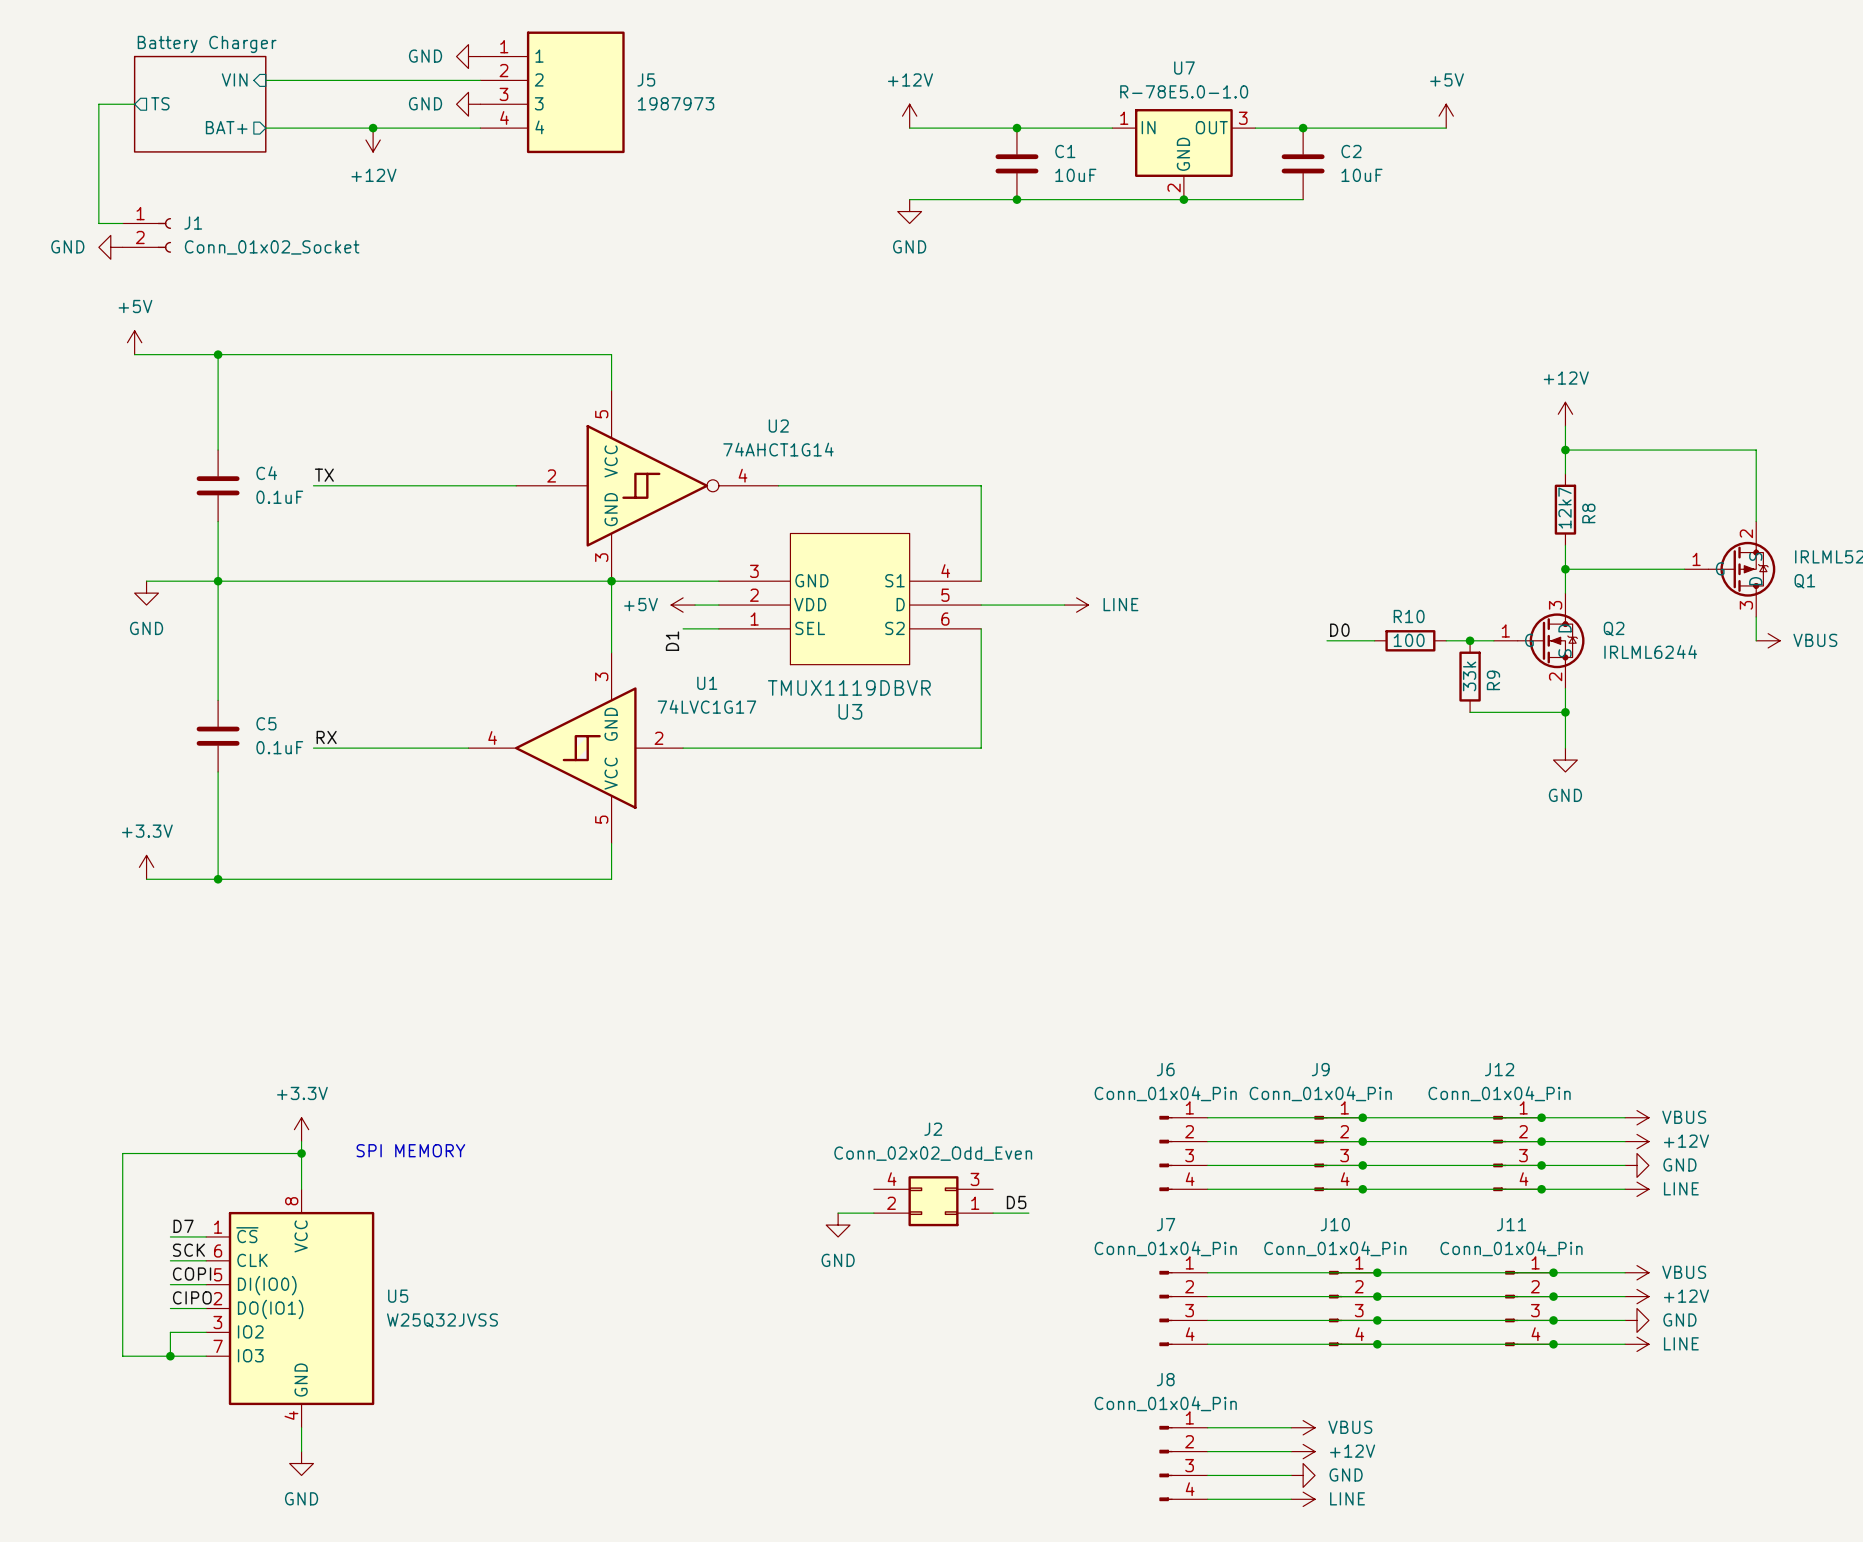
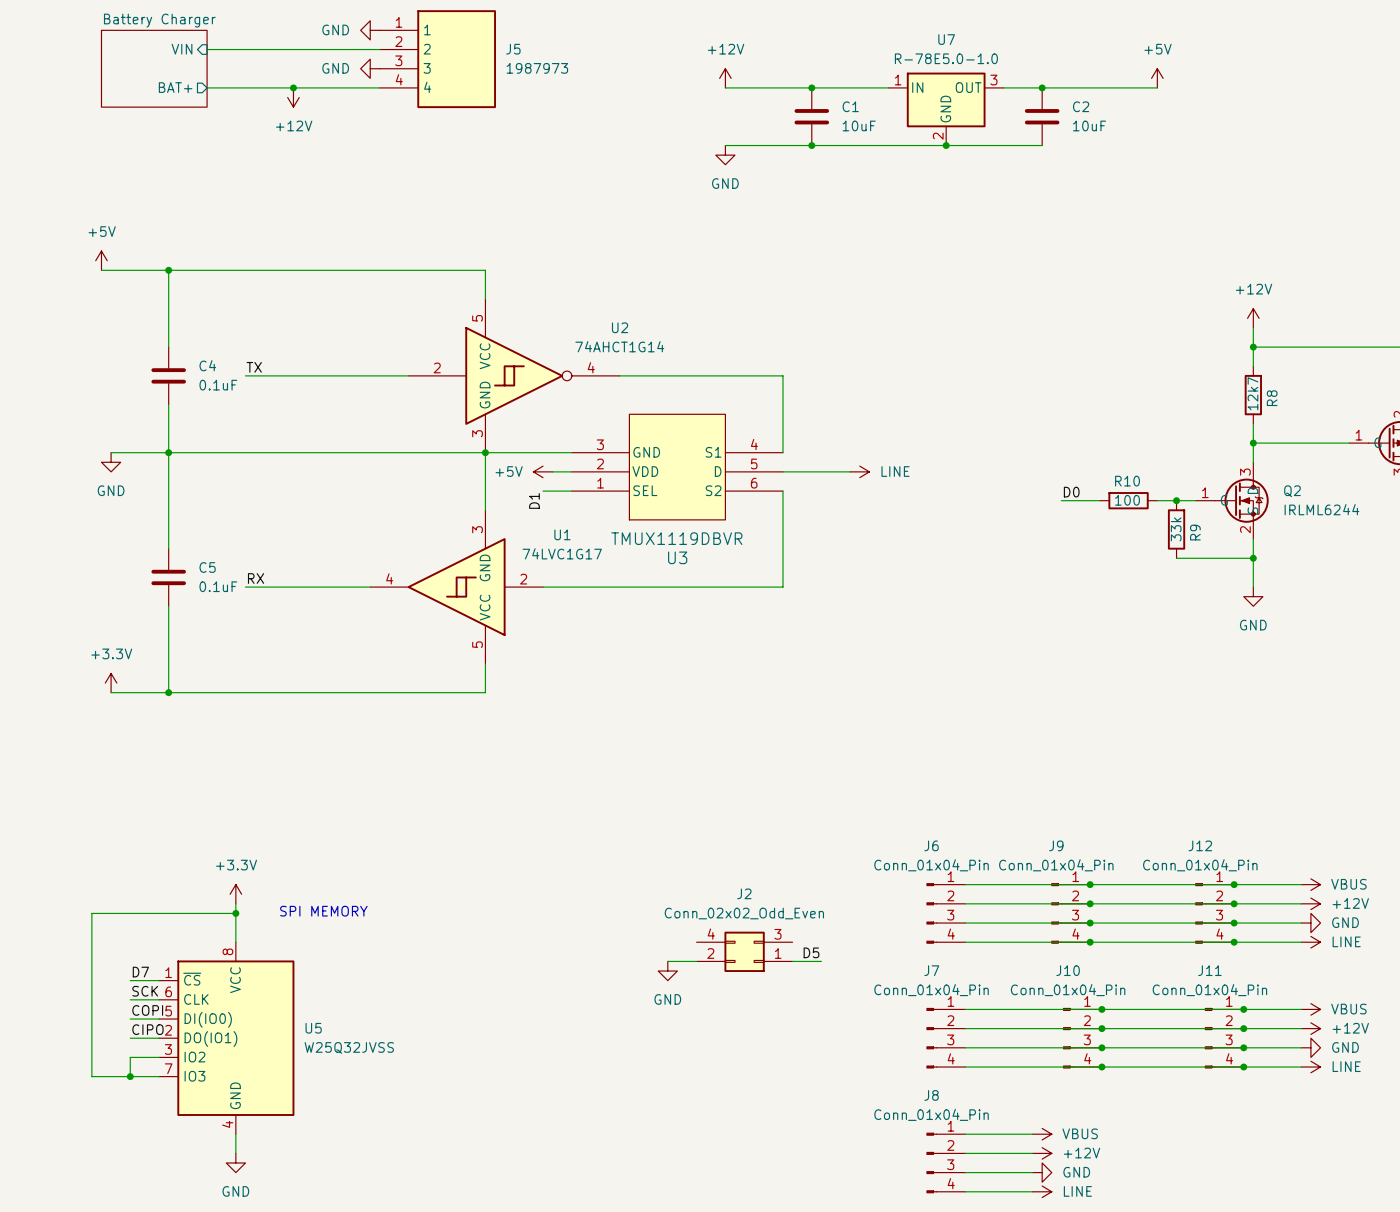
sheet pin: TS (160, 103) -> none
wire: (134, 104) (98, 104) (98, 223) (122, 223) -> none
J1: Conn_01x02_Socket (146, 235) -> none
power symbol: GND (110, 247) -> none

